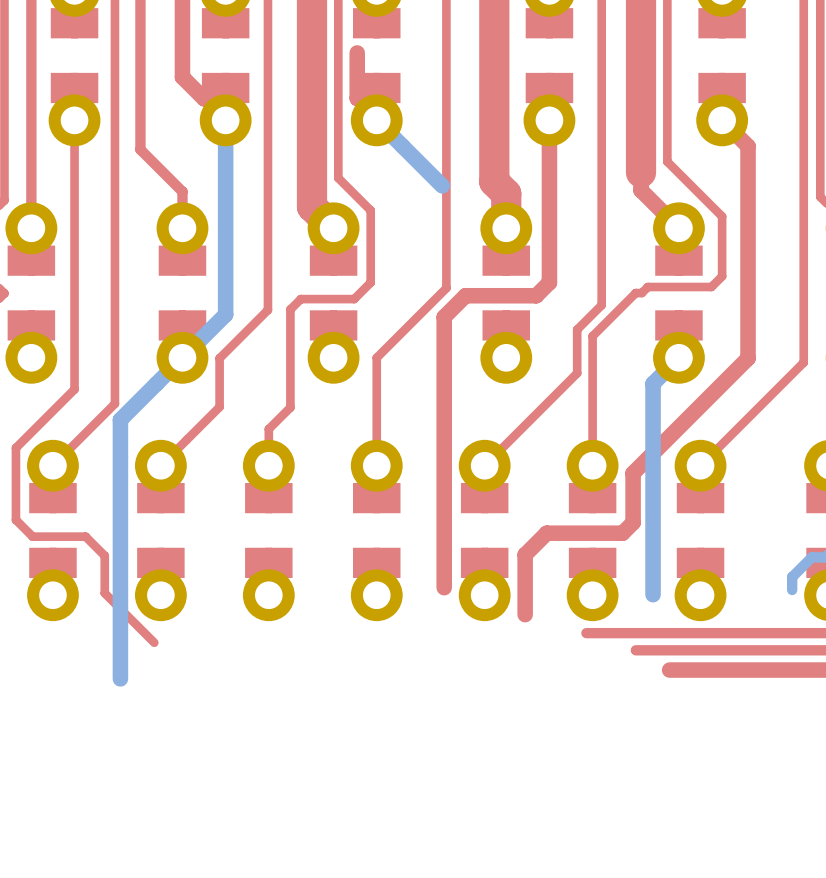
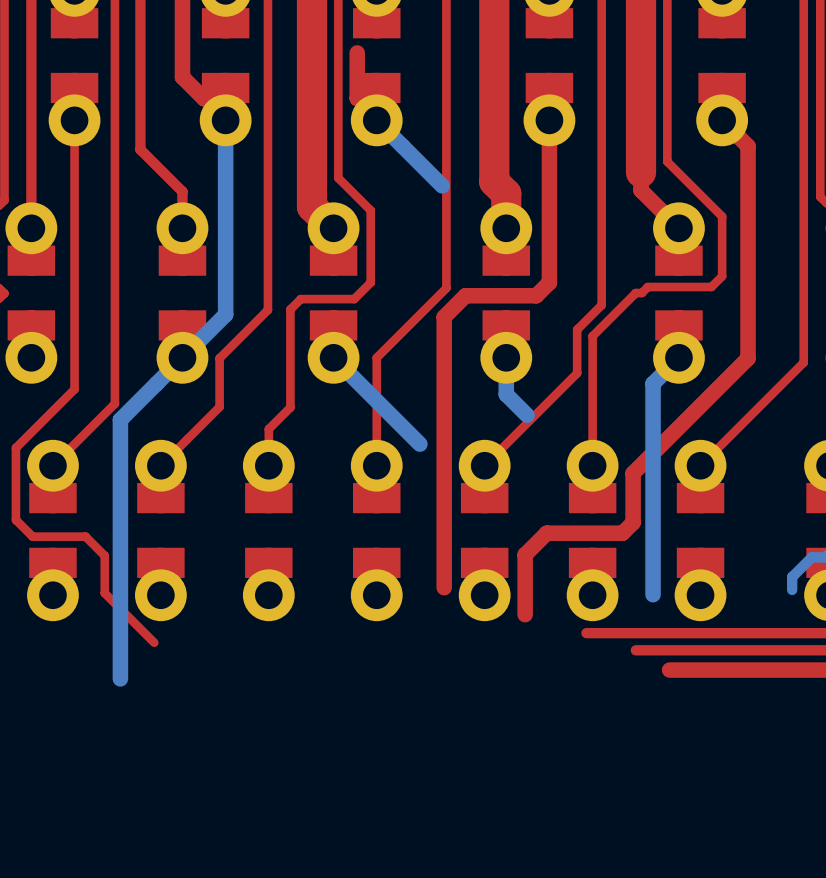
bottom track: none -> (333, 357) (419, 444)
bottom track: none -> (506, 357) (506, 394) (527, 415)

